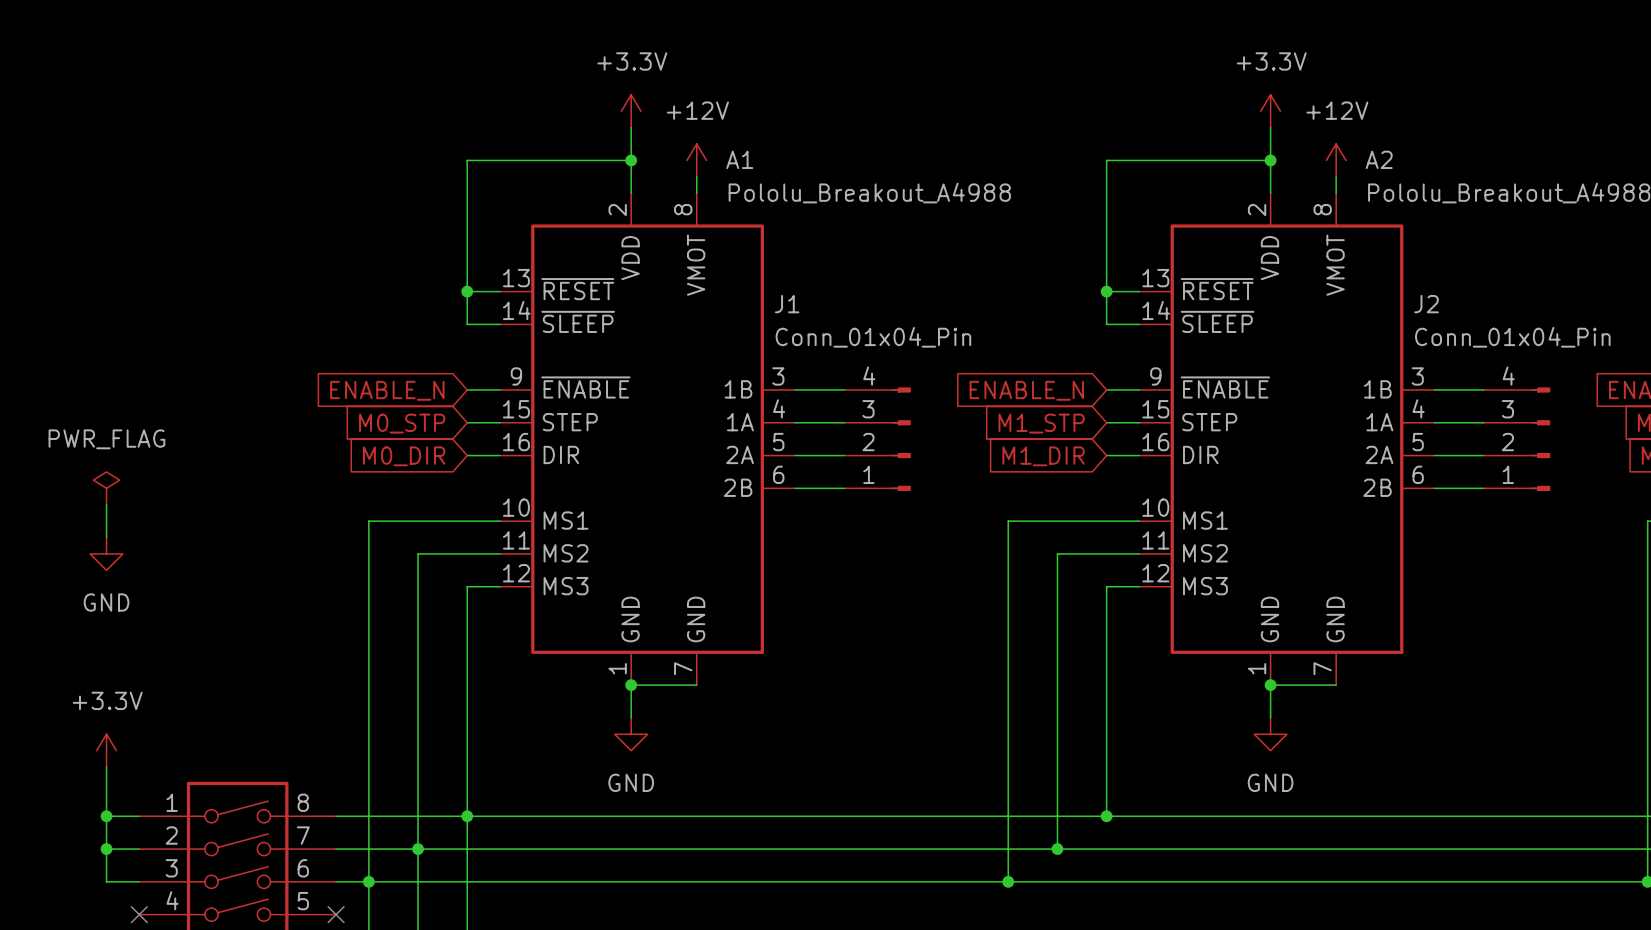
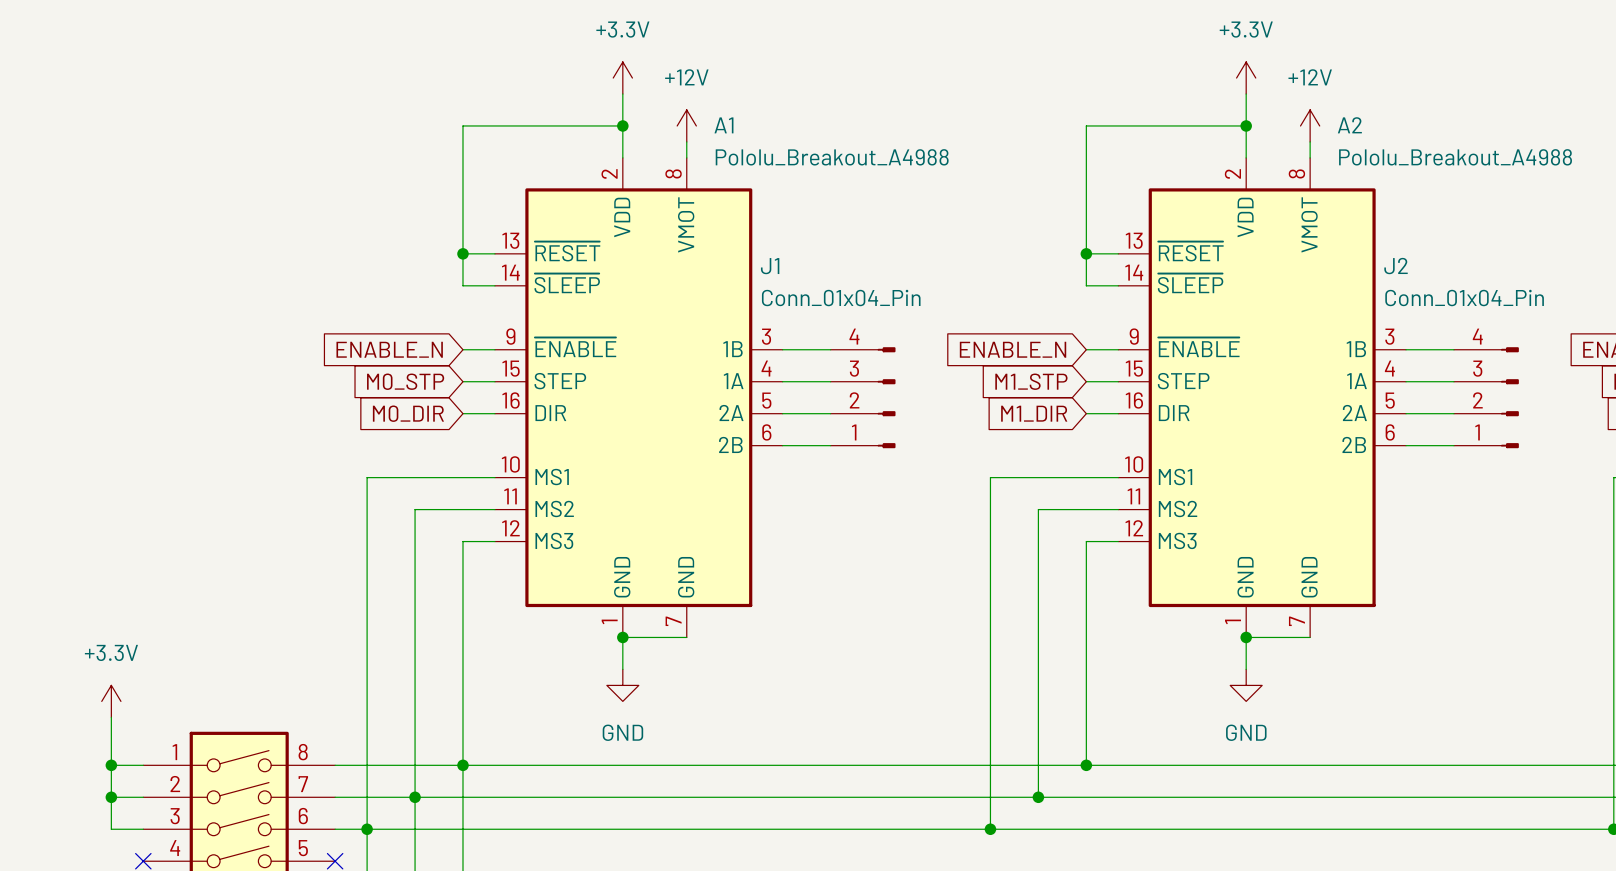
power symbol: PWR_FLAG (106, 488) -> none
wire: (106, 504) (106, 537) -> none
power symbol: GND (106, 553) -> none

